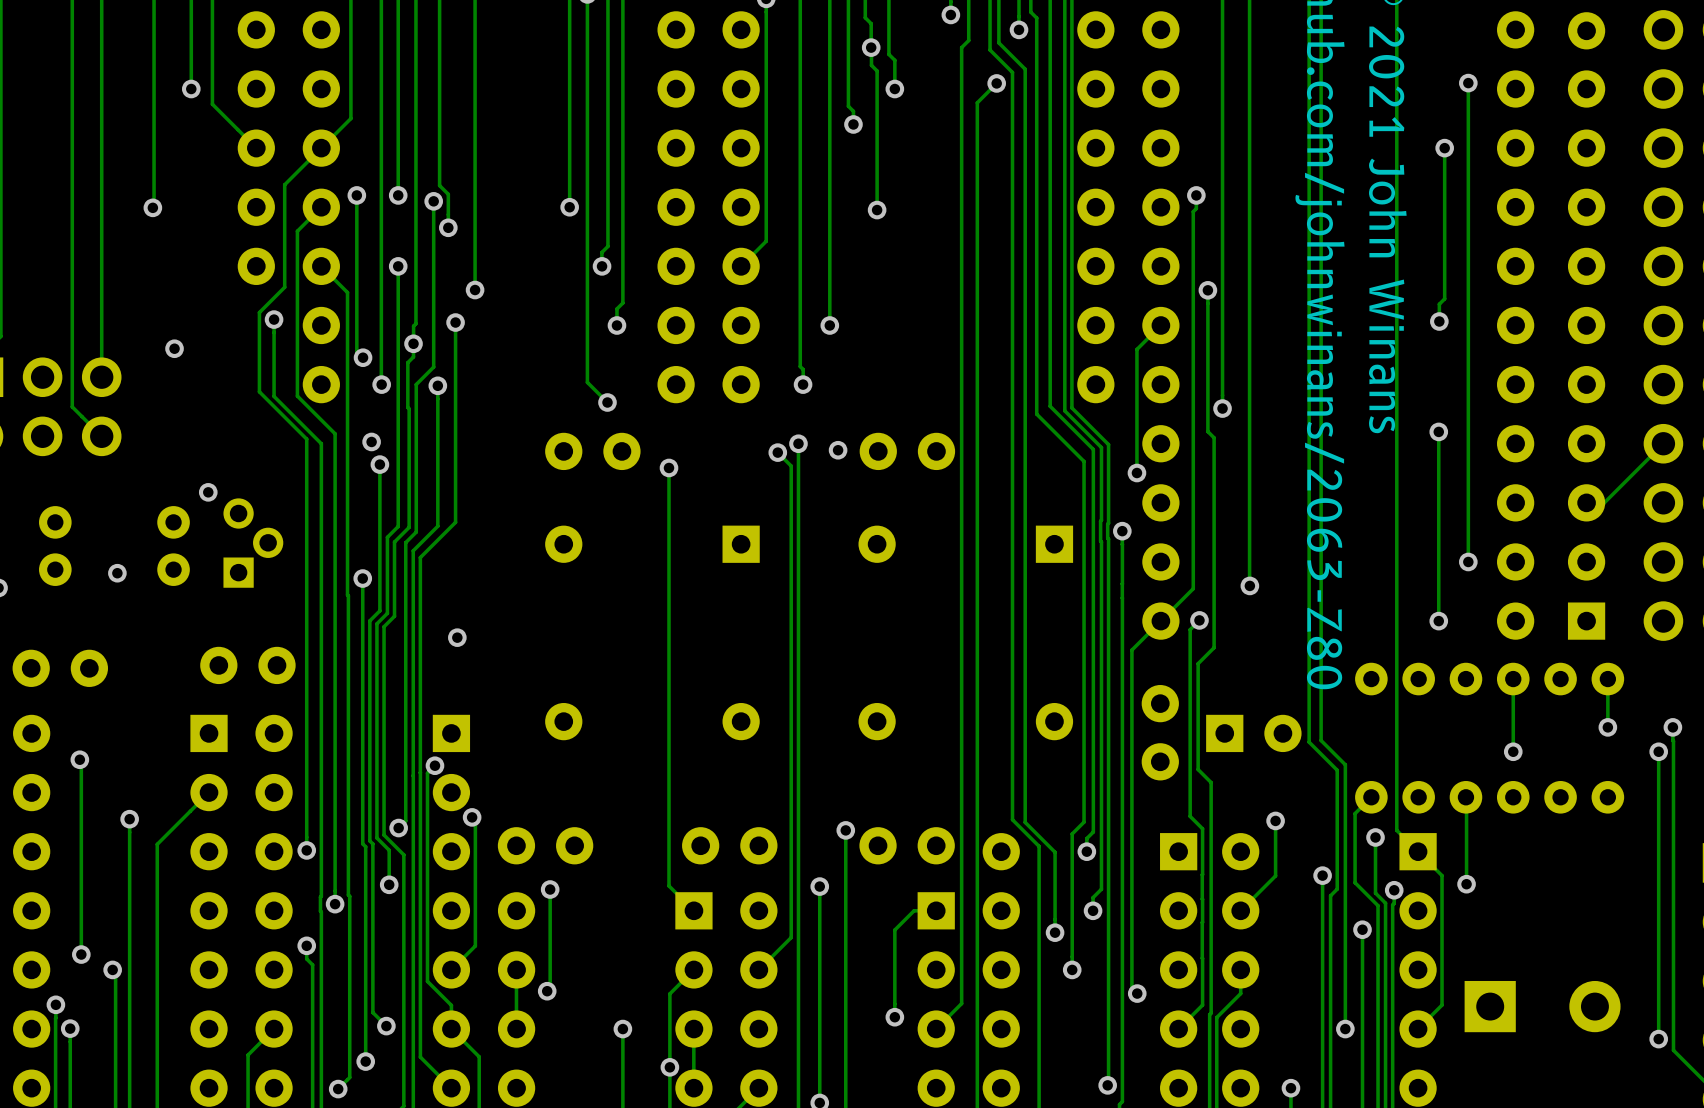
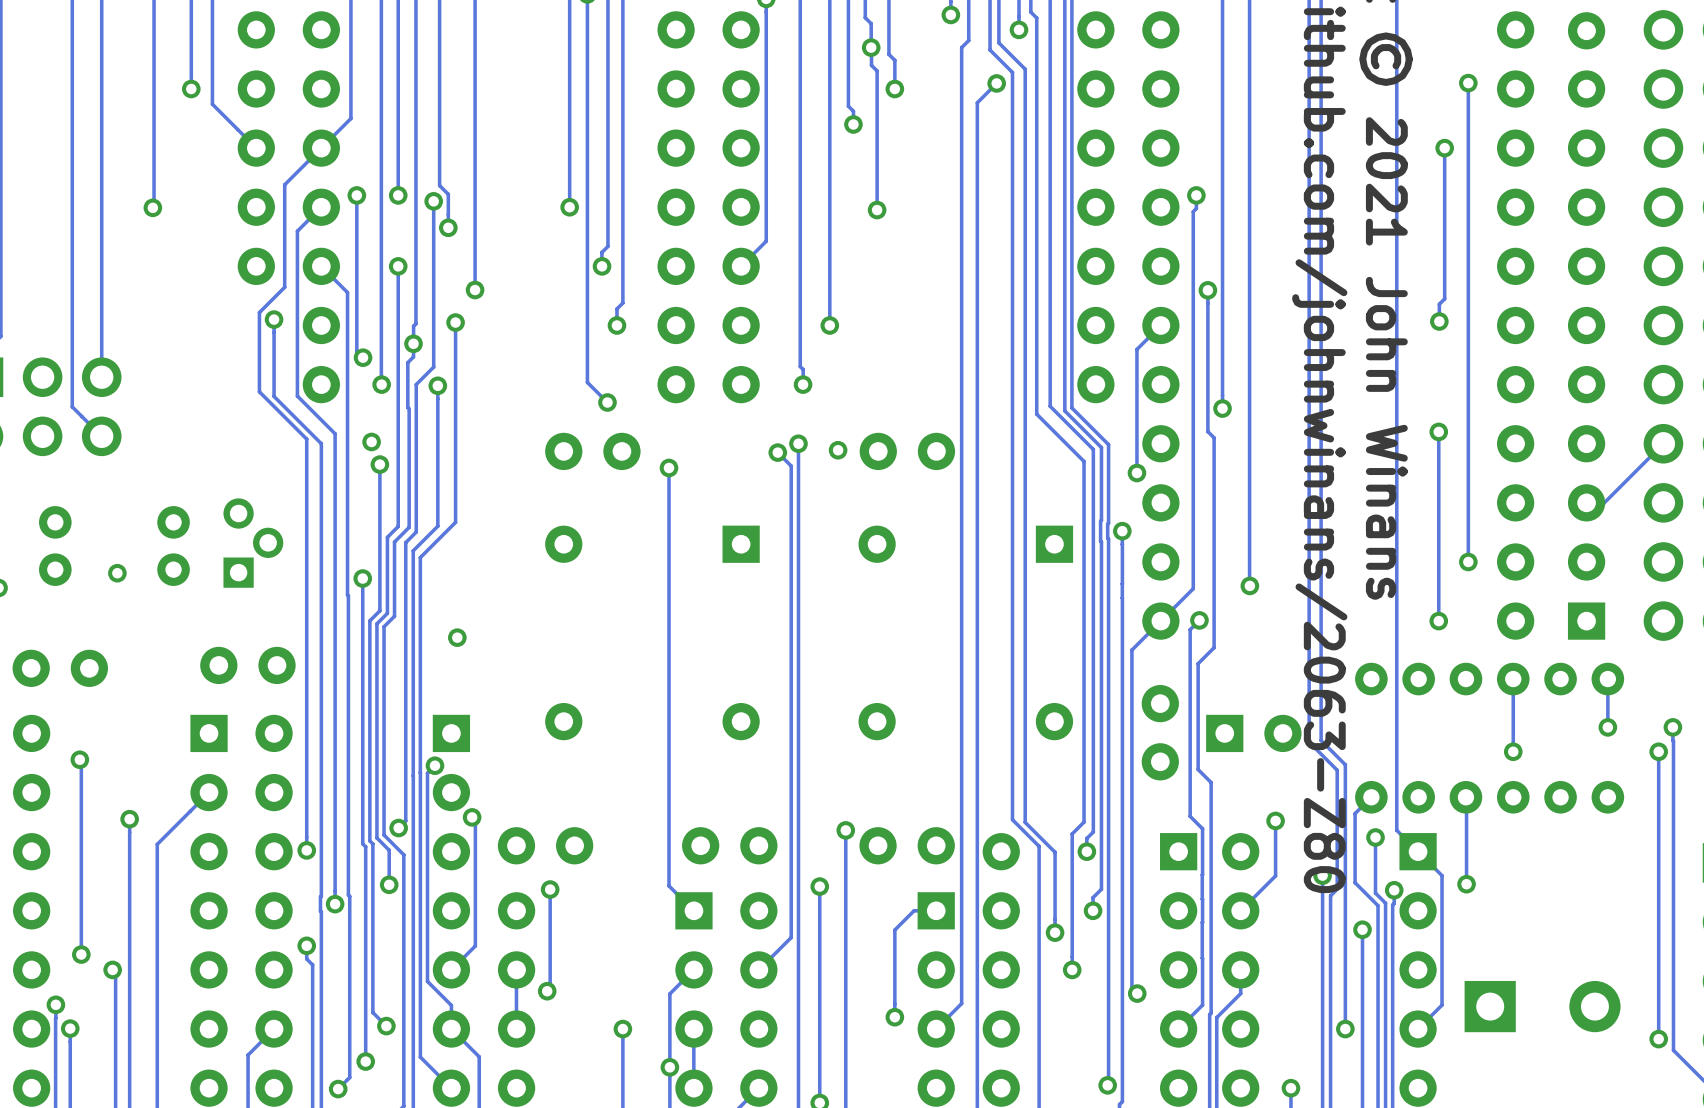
via: (174, 348) -> none
via: (208, 492) -> none

